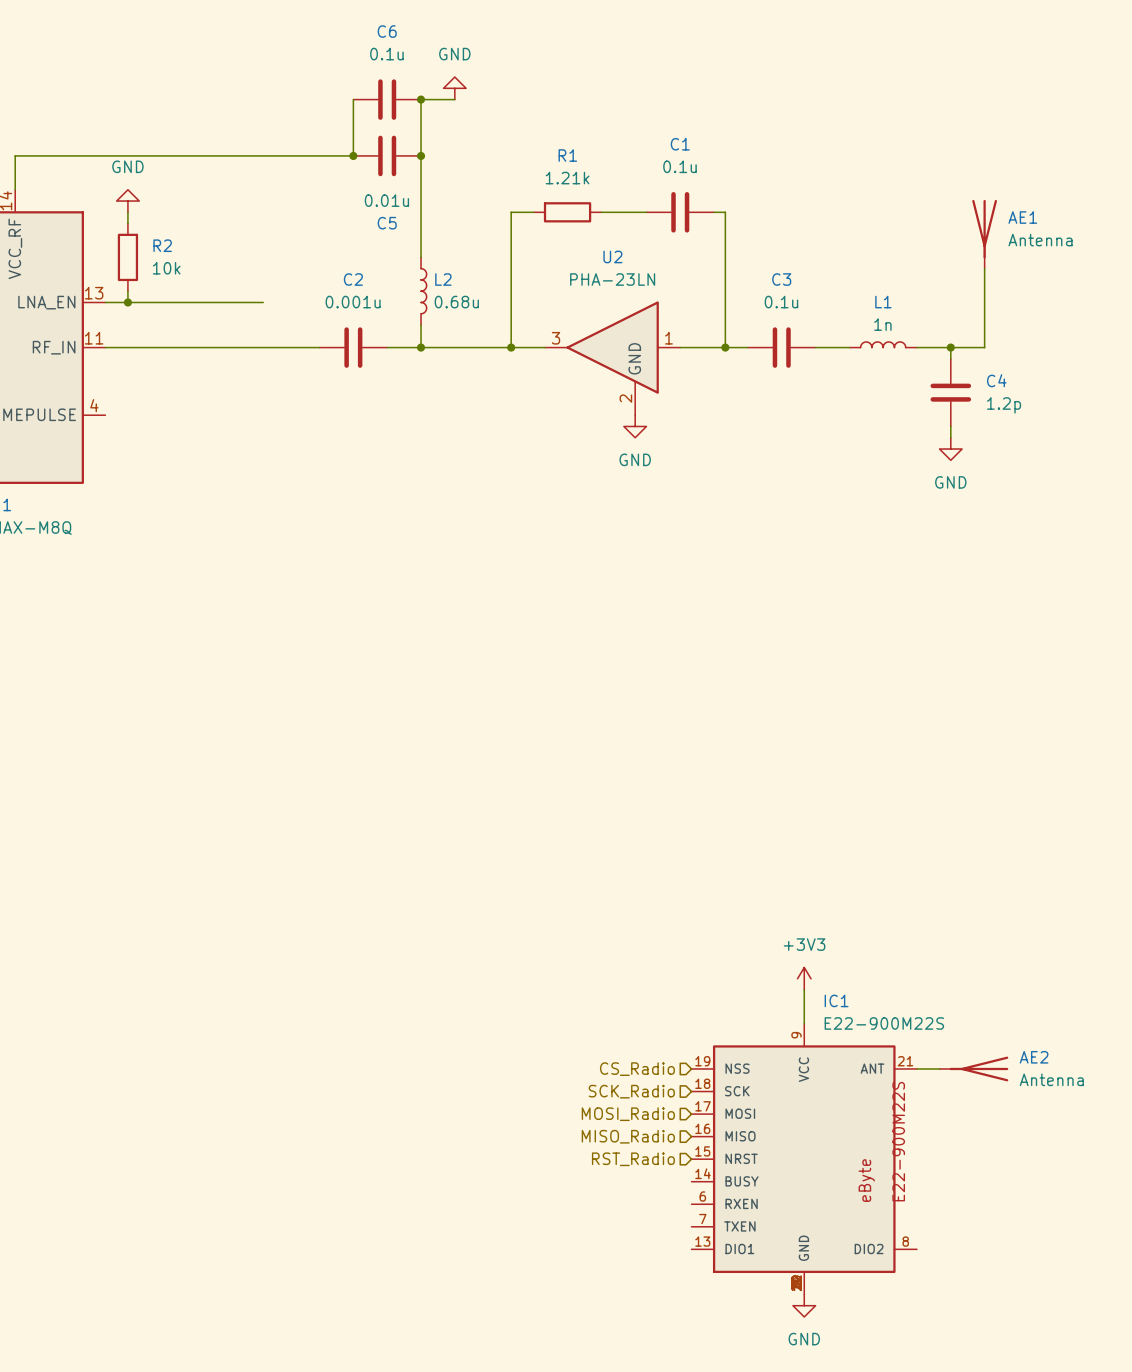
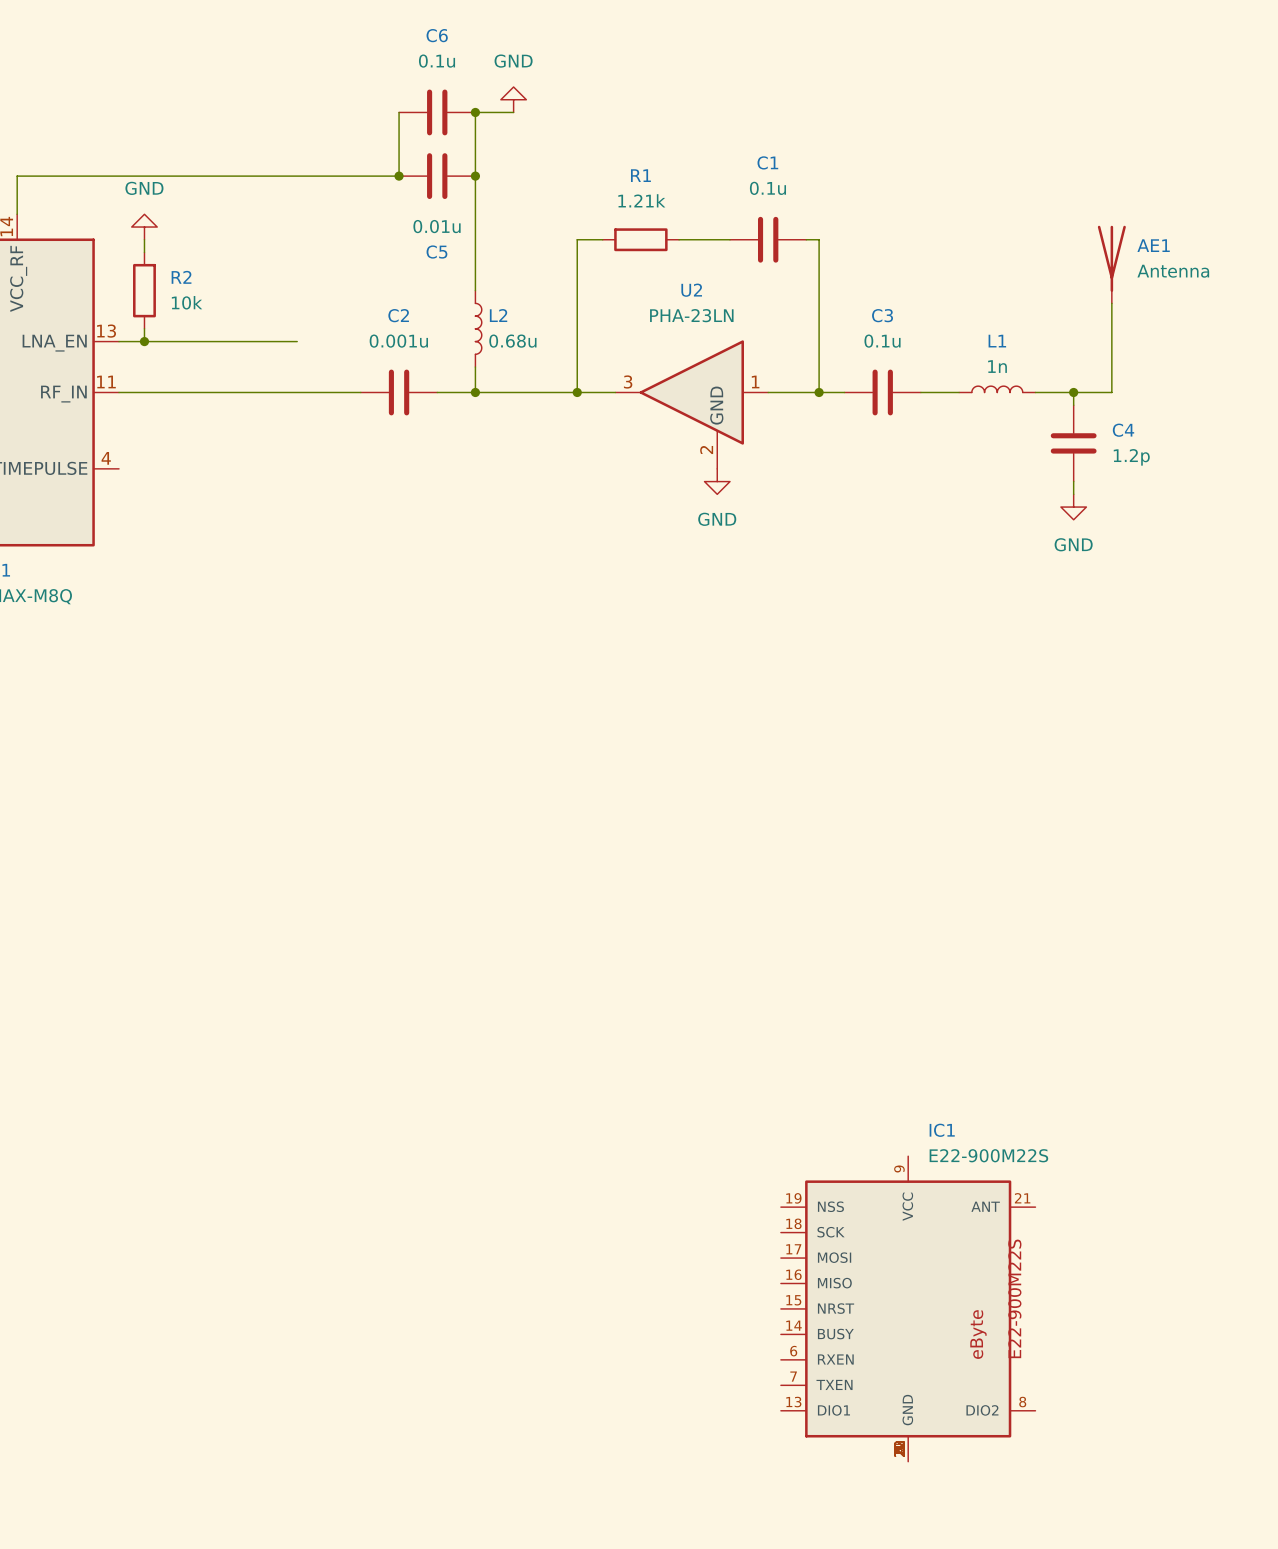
power symbol: +3V3 (804, 978) -> none
wire: (804, 990) (804, 1023) -> none
wire: (916, 1068) (939, 1068) -> none
AE2: Antenna (973, 1068) -> none
hierarchical label: CS_Radio (637, 1069) -> none
hierarchical label: SCK_Radio (631, 1091) -> none
hierarchical label: MOSI_Radio (628, 1114) -> none
hierarchical label: MISO_Radio (628, 1136) -> none
hierarchical label: RST_Radio (633, 1159) -> none
power symbol: GND (804, 1305) -> none

